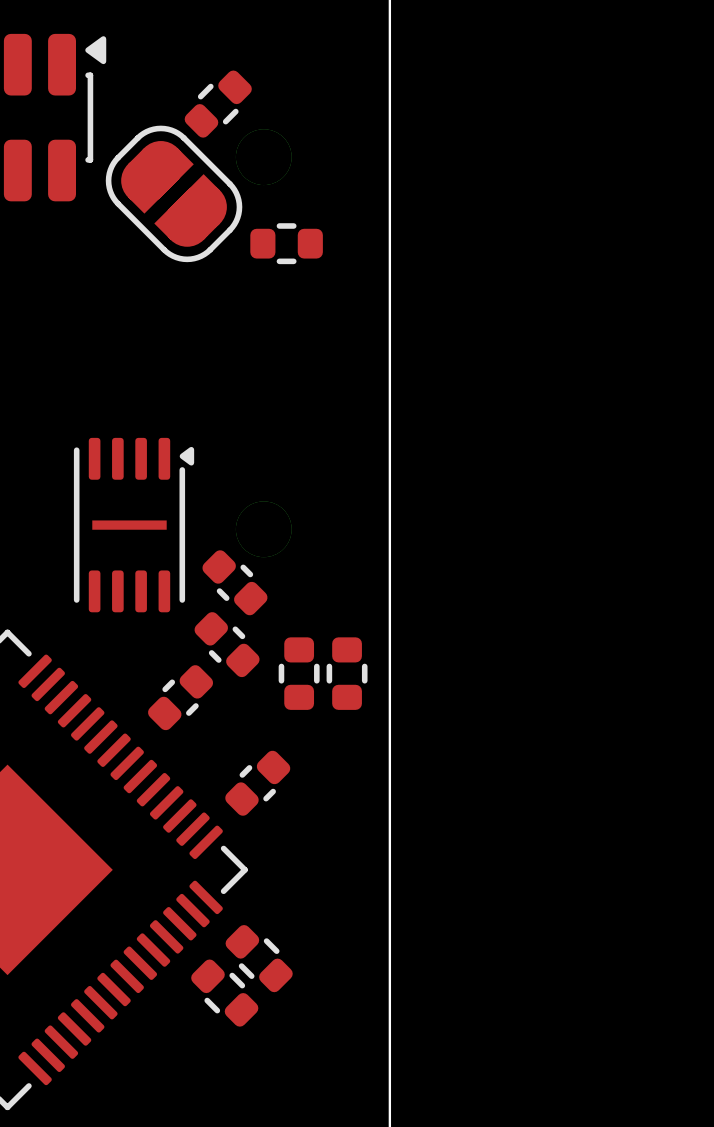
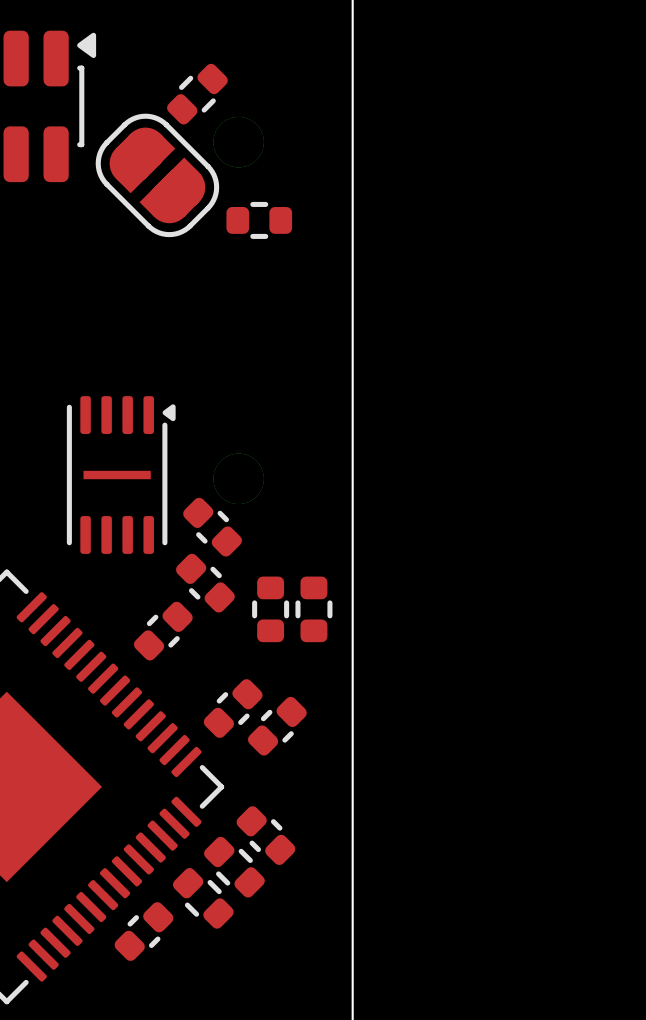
part: none -> (277, 726)
part: none -> (265, 835)
part: none -> (143, 931)

